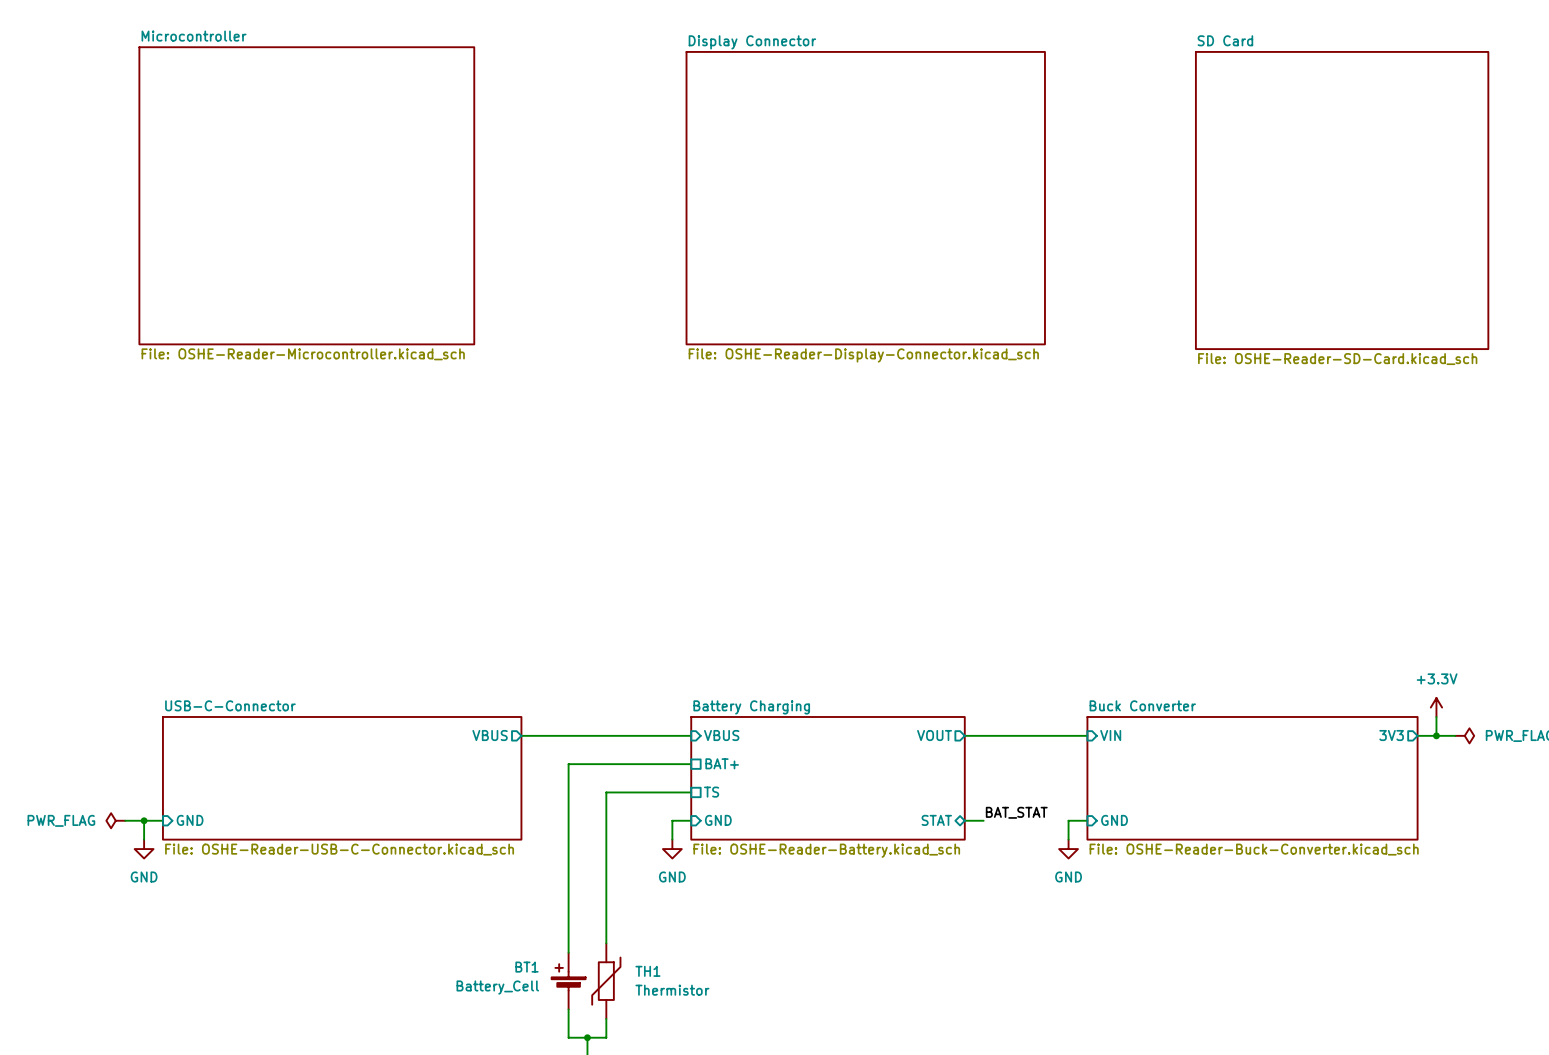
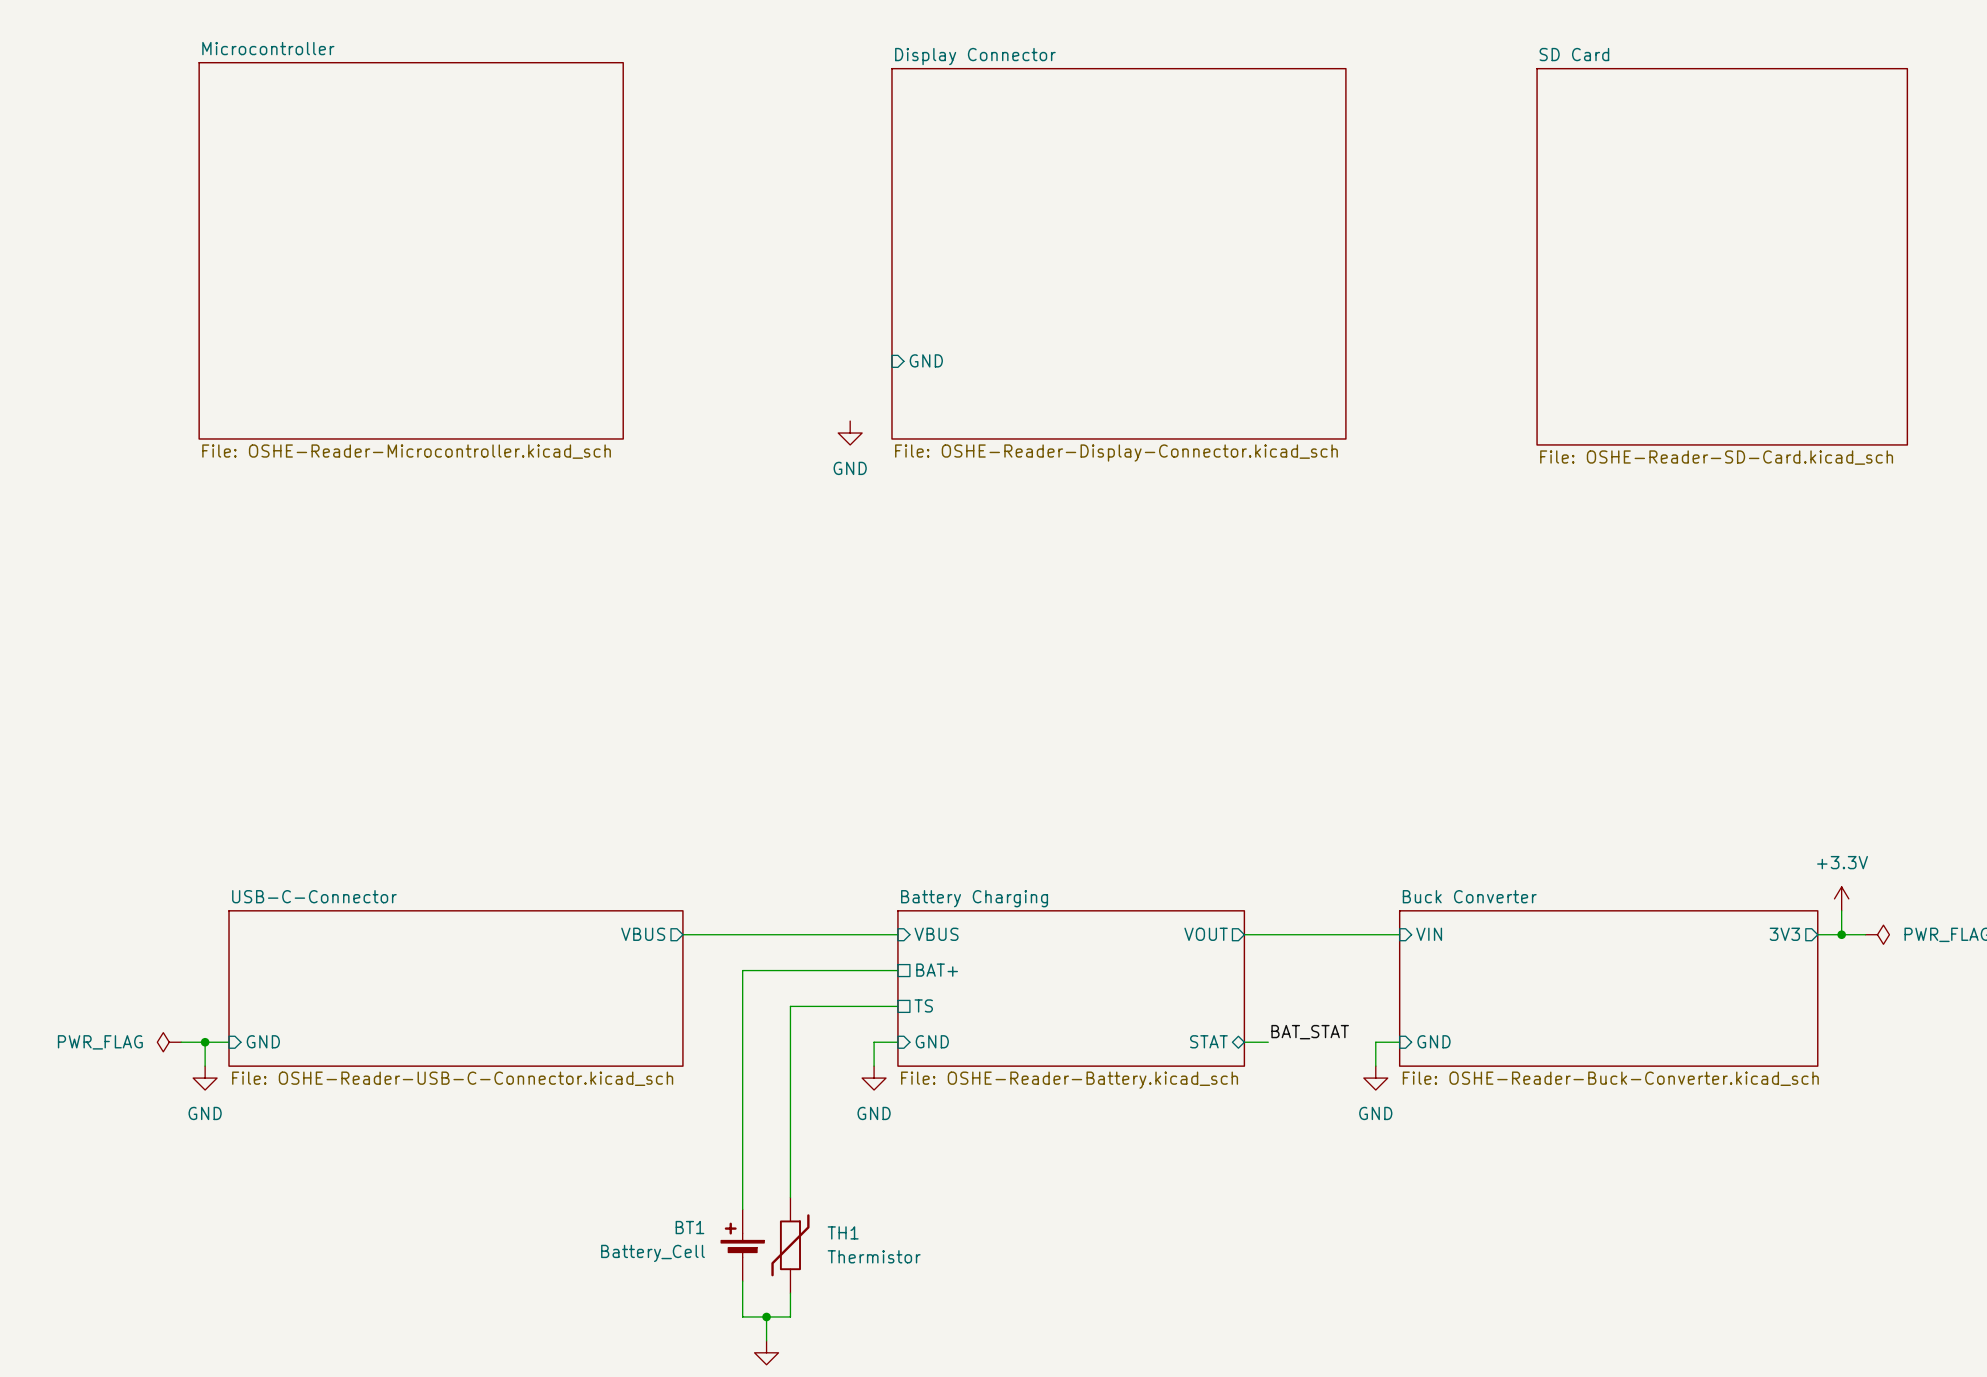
sheet pin: none -> GND (926, 360)
power symbol: none -> GND (850, 433)

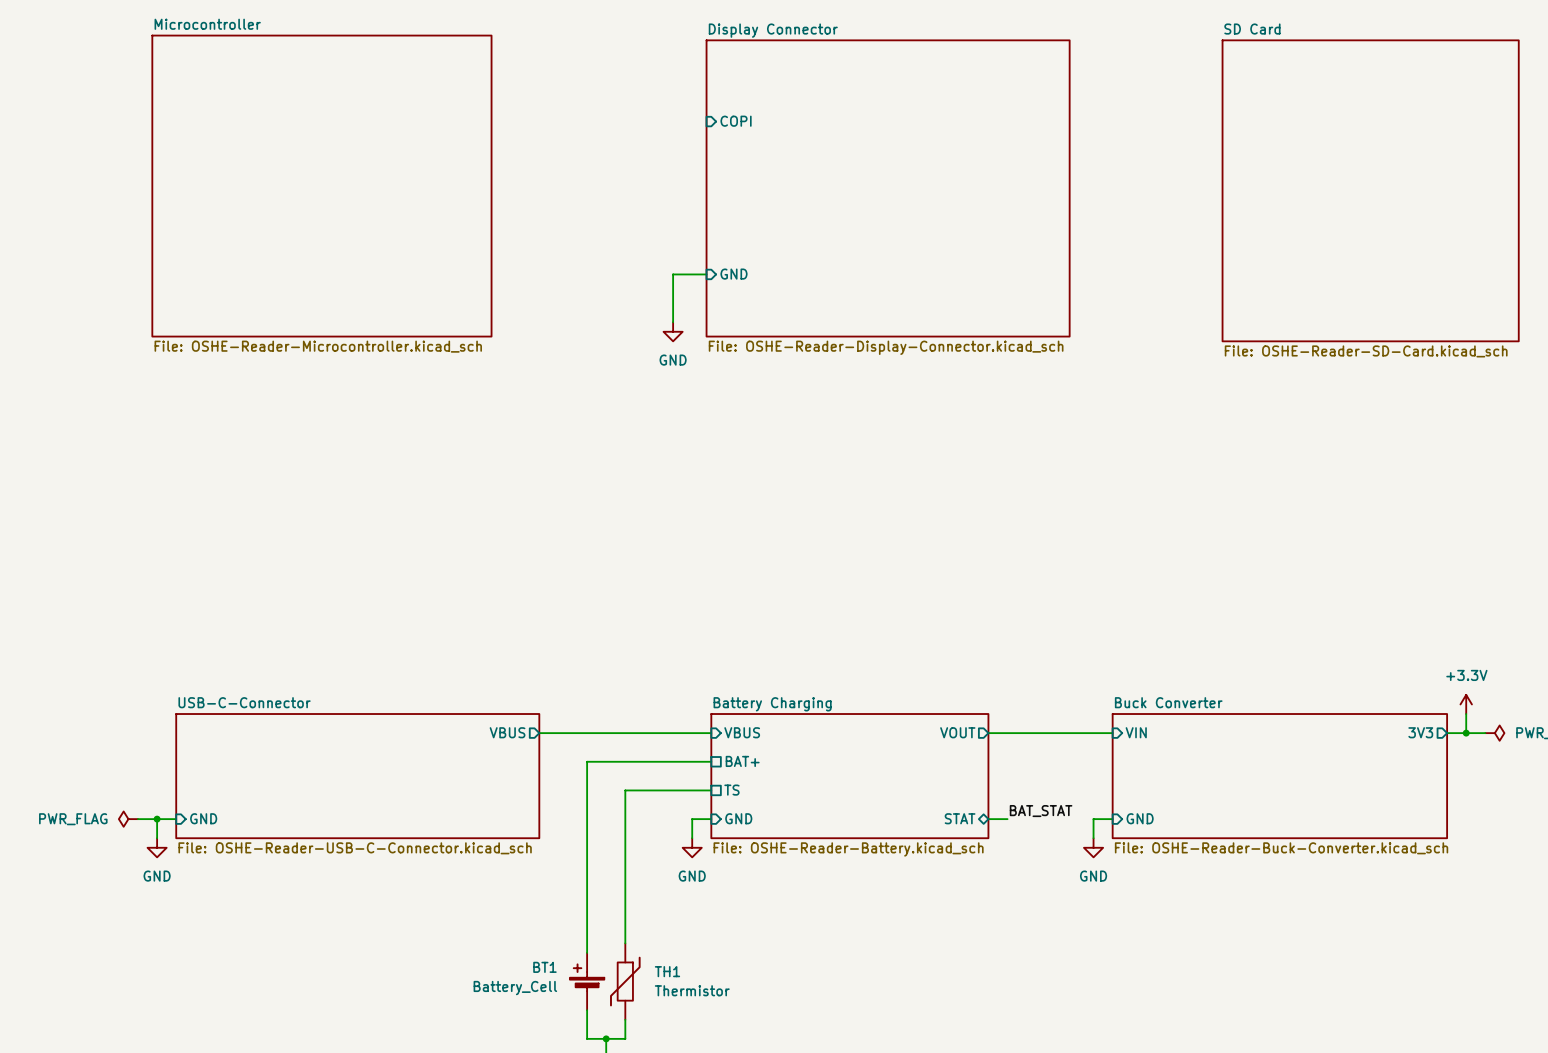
sheet pin: none -> COPI (736, 121)
wire: none -> (706, 274) (673, 274) (673, 322)

